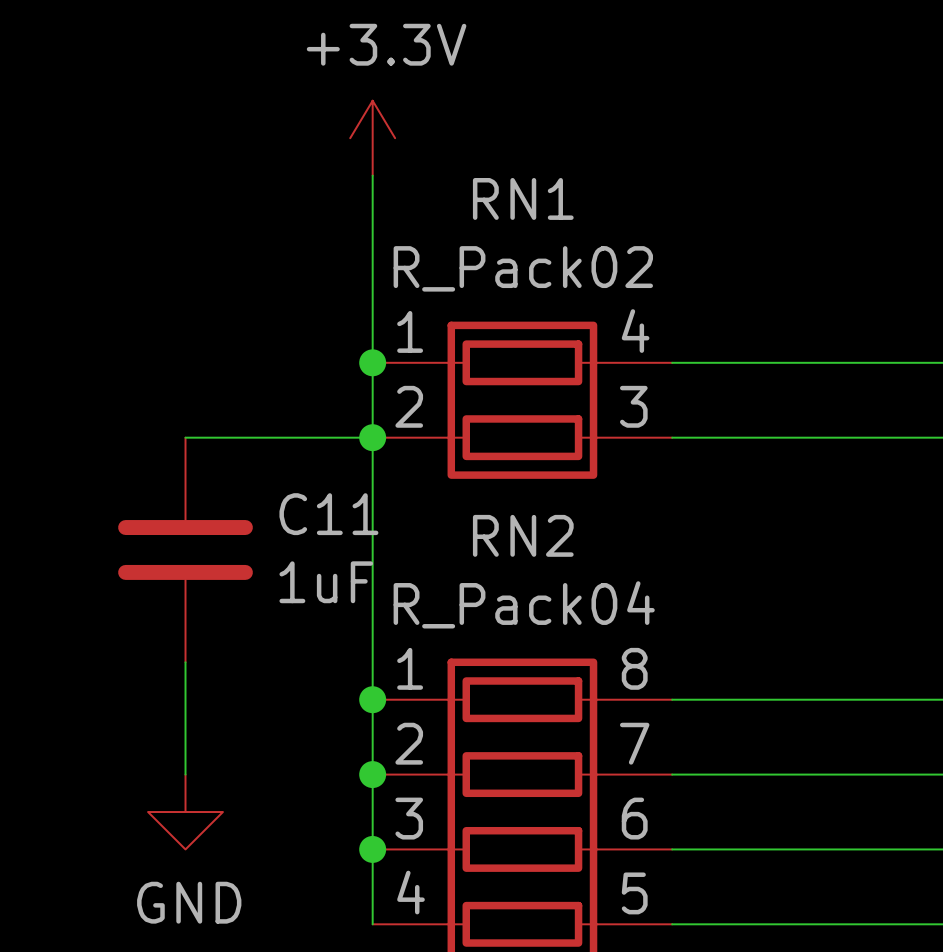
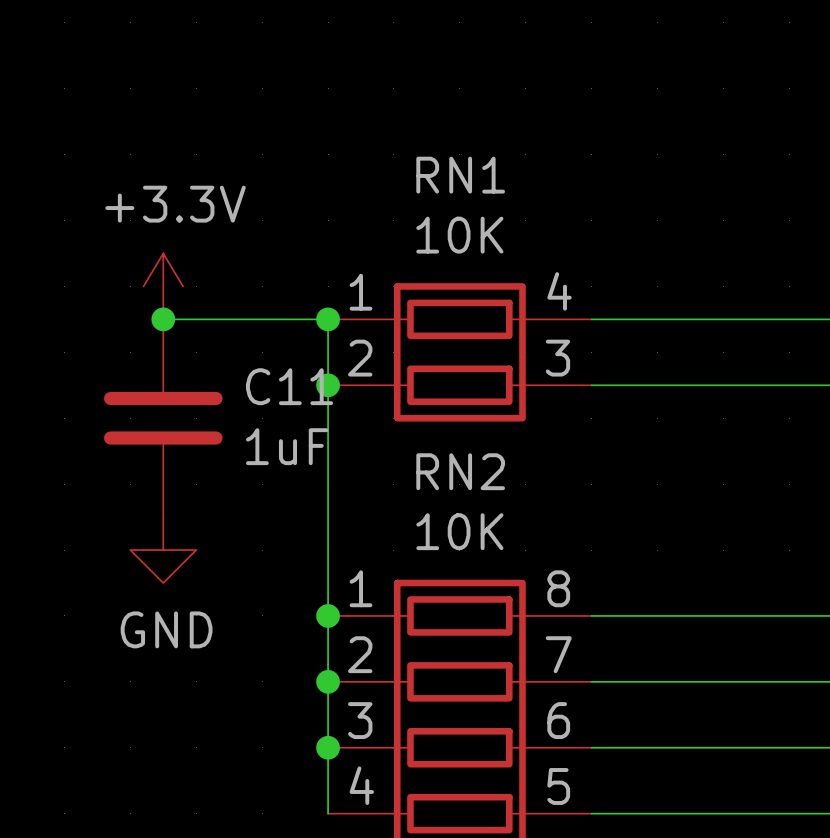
power symbol position: +3.3V (372, 138) -> +3.3V (163, 286)
wire: (372, 175) (372, 362) -> (163, 319) (328, 319)
RN1 value: R_Pack02 (523, 268) -> 10K (459, 235)
junction: none -> (163, 319)
wire: (185, 437) (372, 437) -> none
C11 position: (185, 549) -> (163, 418)
RN2 value: R_Pack04 (524, 604) -> 10K (459, 531)
wire: (185, 662) (185, 774) -> none
power symbol position: GND (185, 812) -> GND (163, 550)

